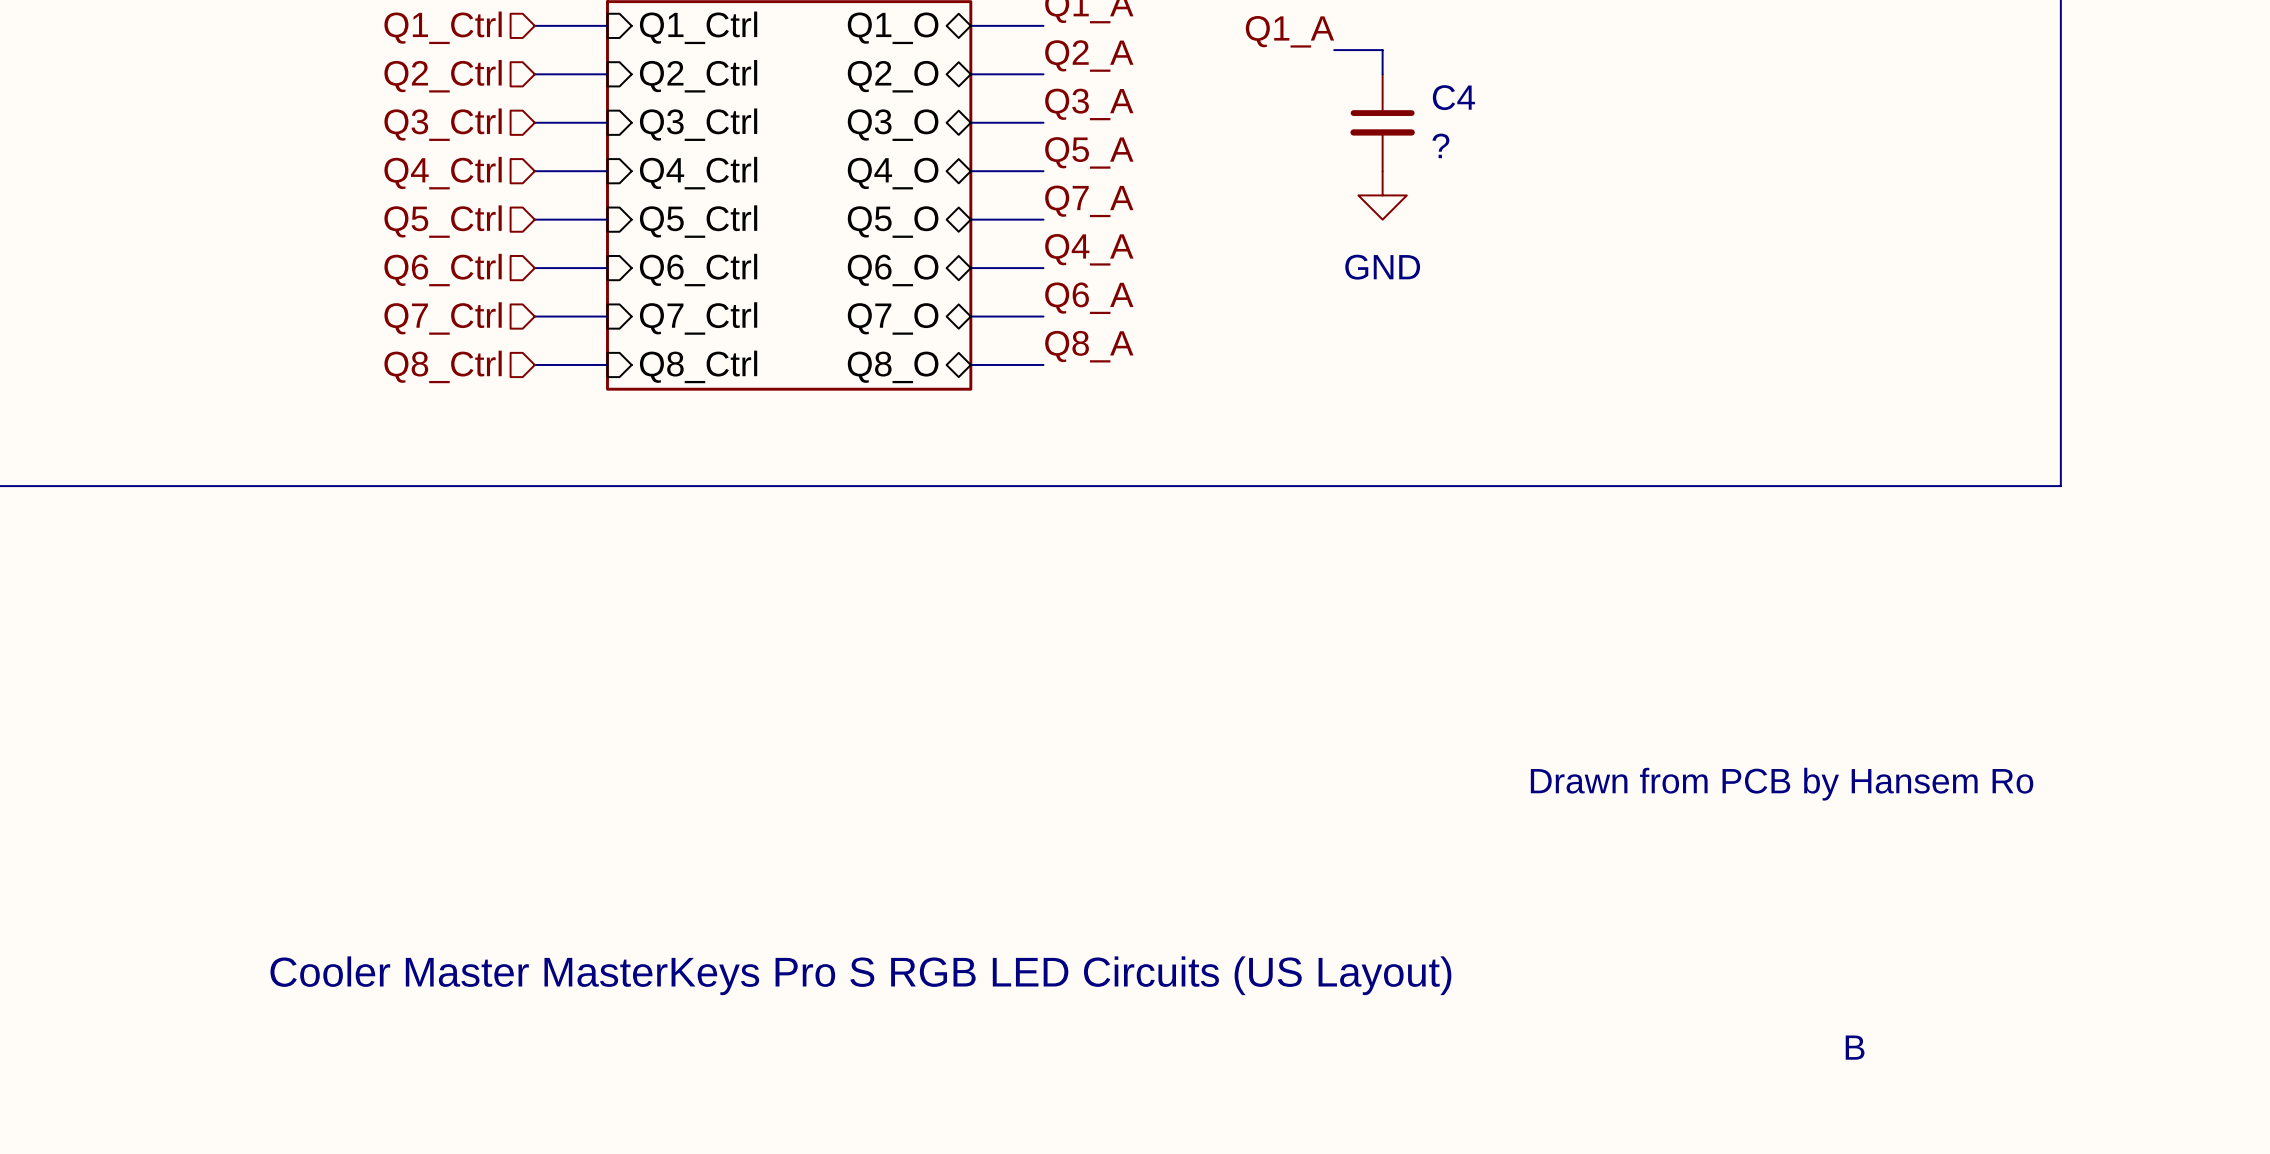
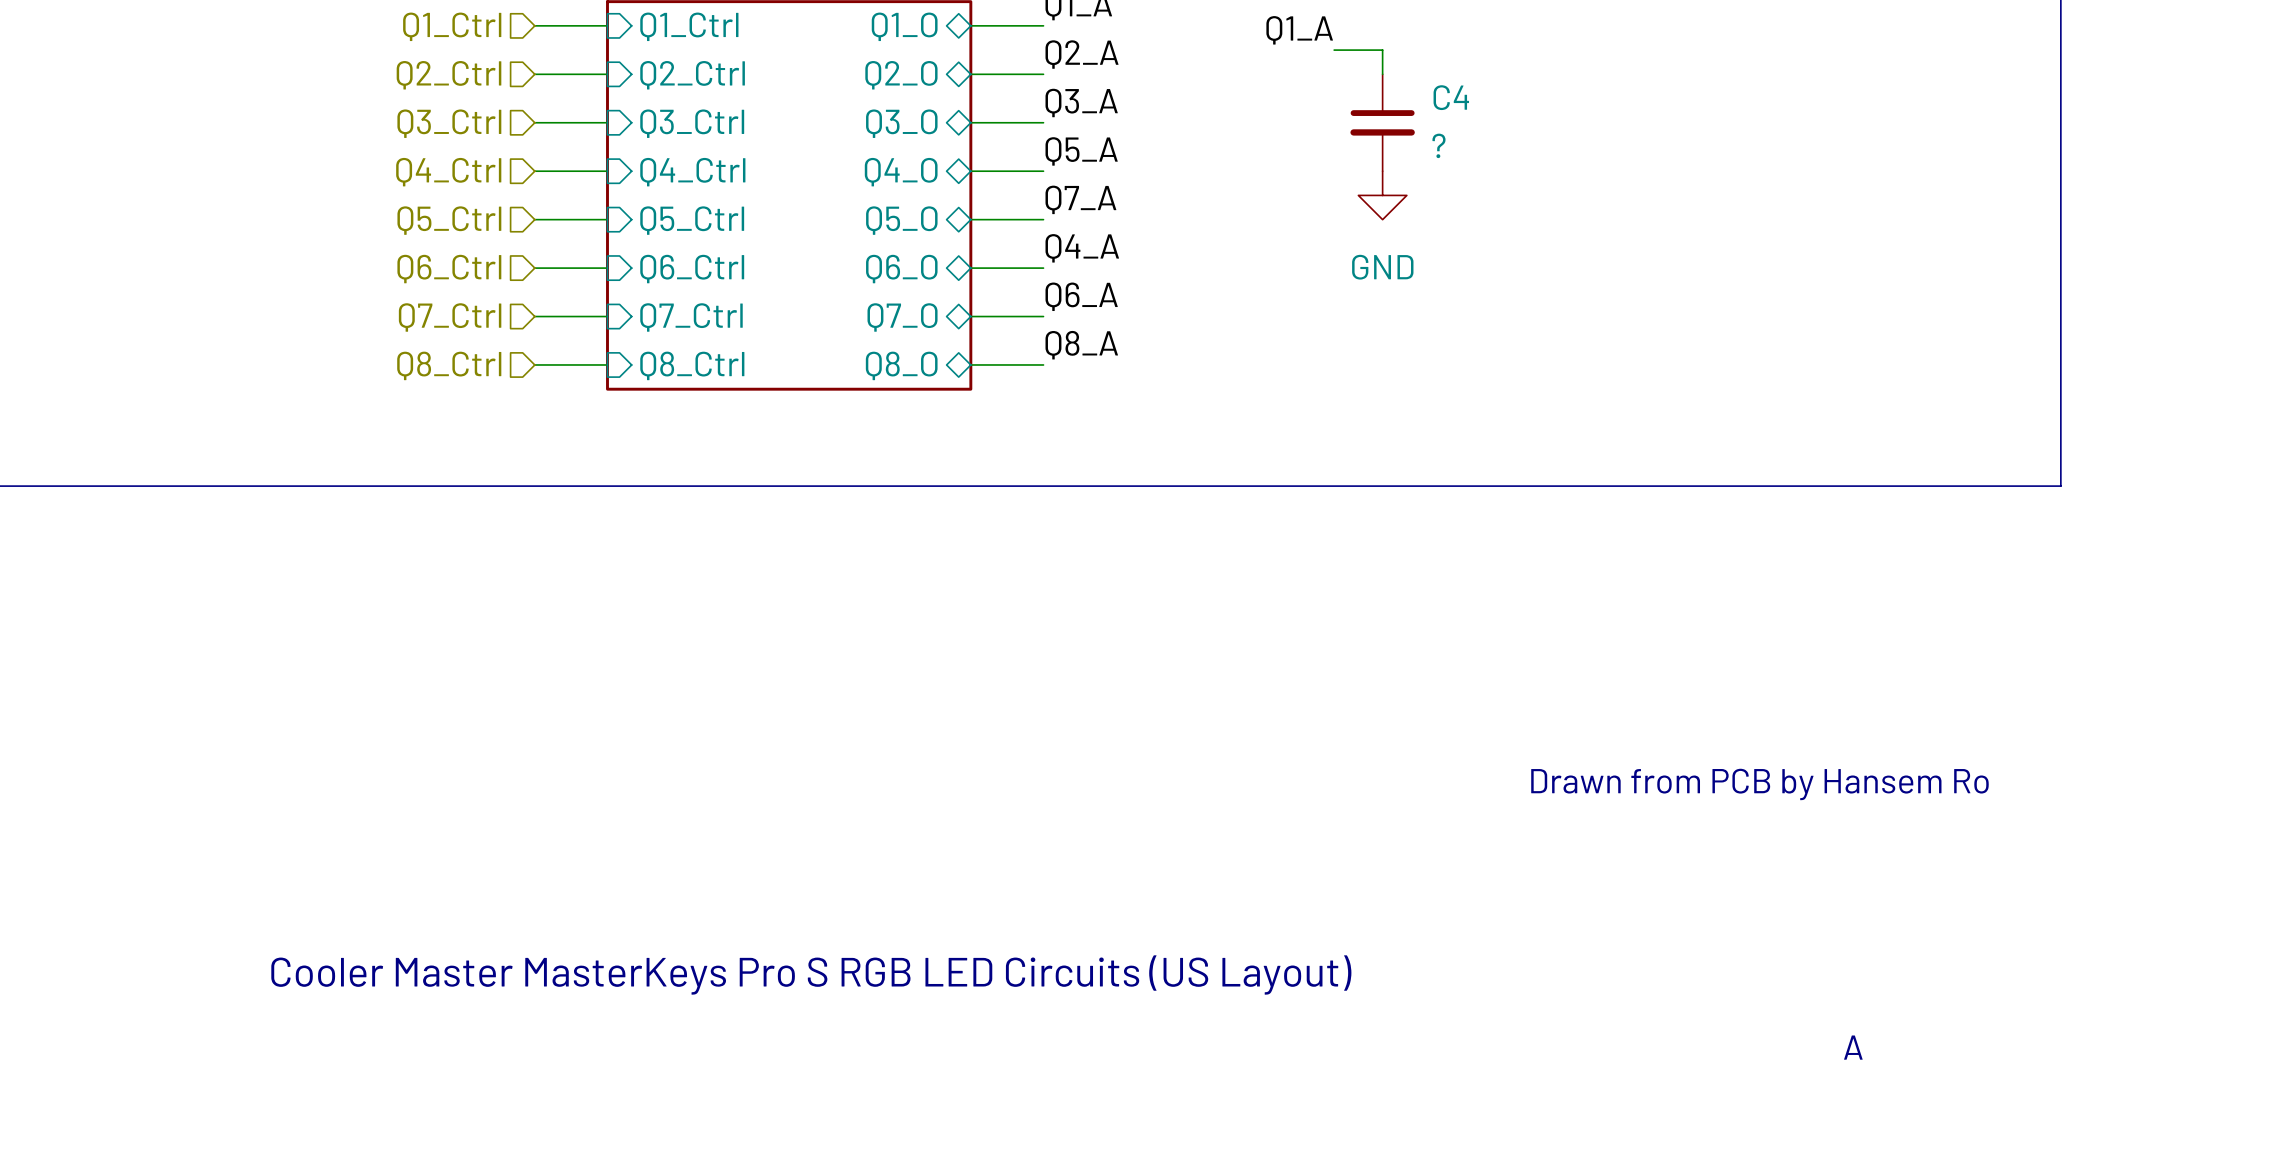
text: B (1855, 1047) -> A (1853, 1047)

